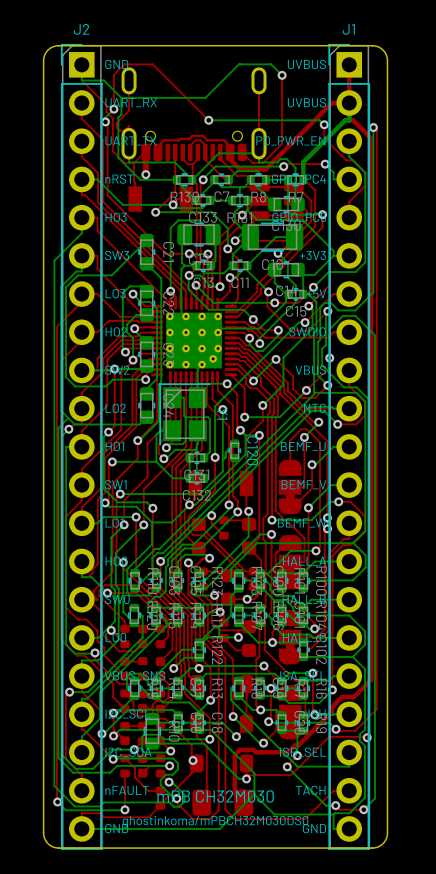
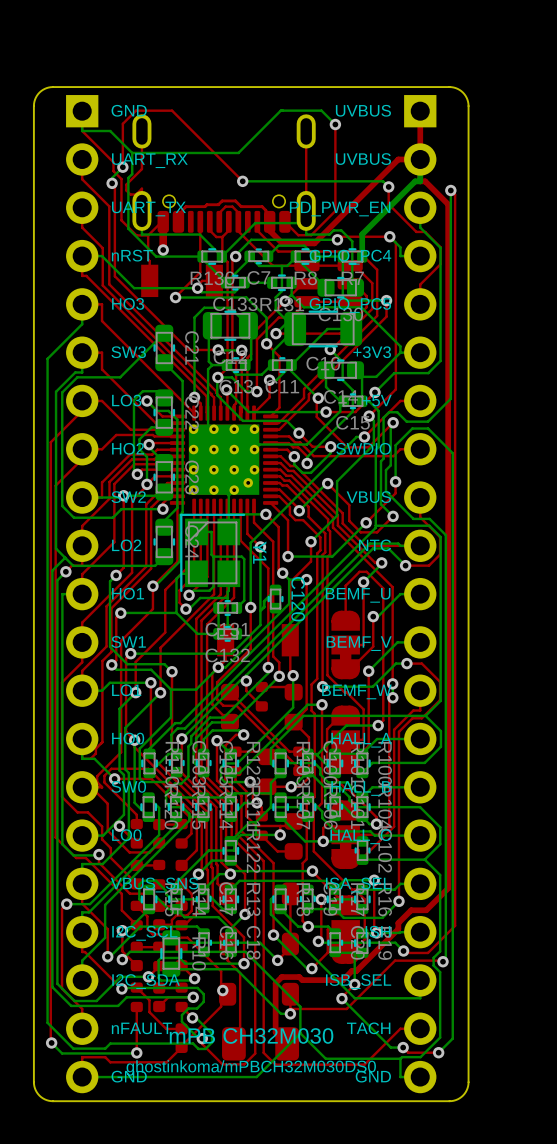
J2 side: bottom (81, 446) -> top (82, 594)
J1 side: bottom (349, 446) -> top (420, 594)

